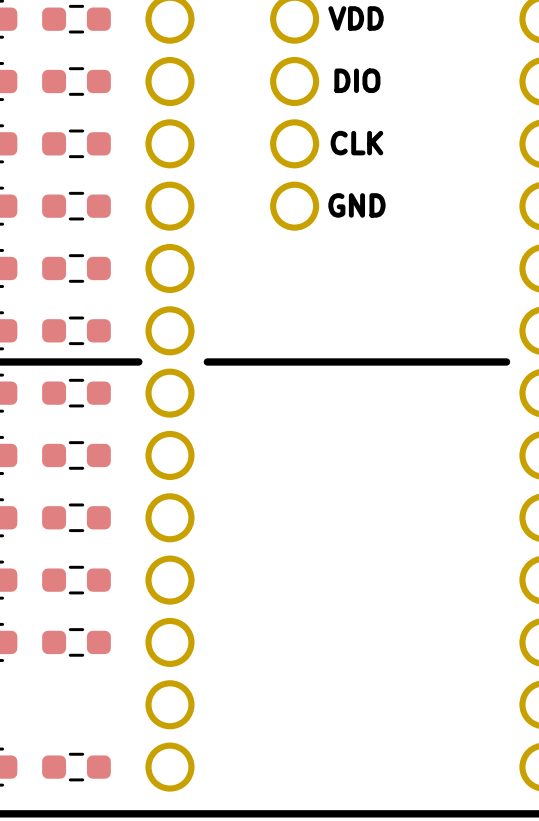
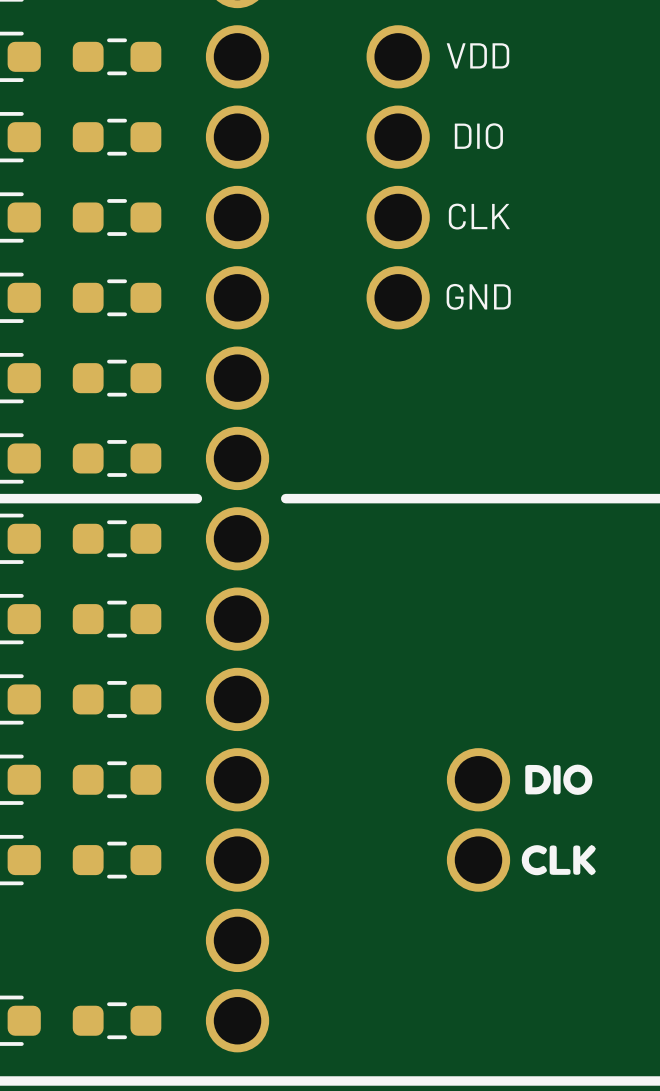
drawing: none -> [525, 764, 593, 795]
part: none -> (478, 819)
drawing: none -> [521, 844, 596, 876]

